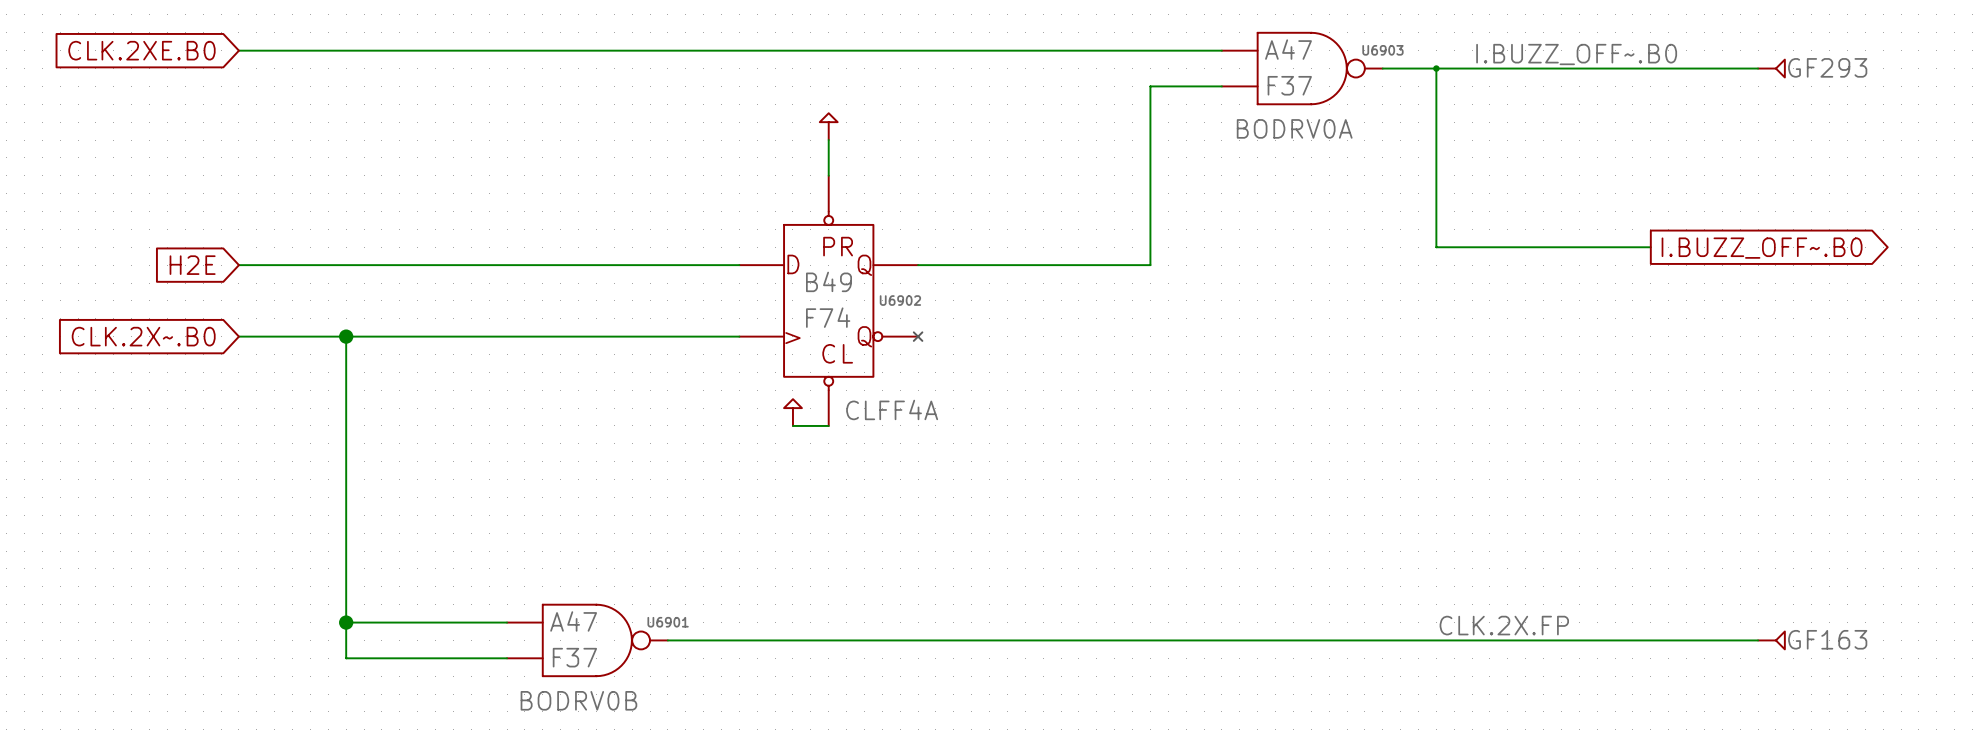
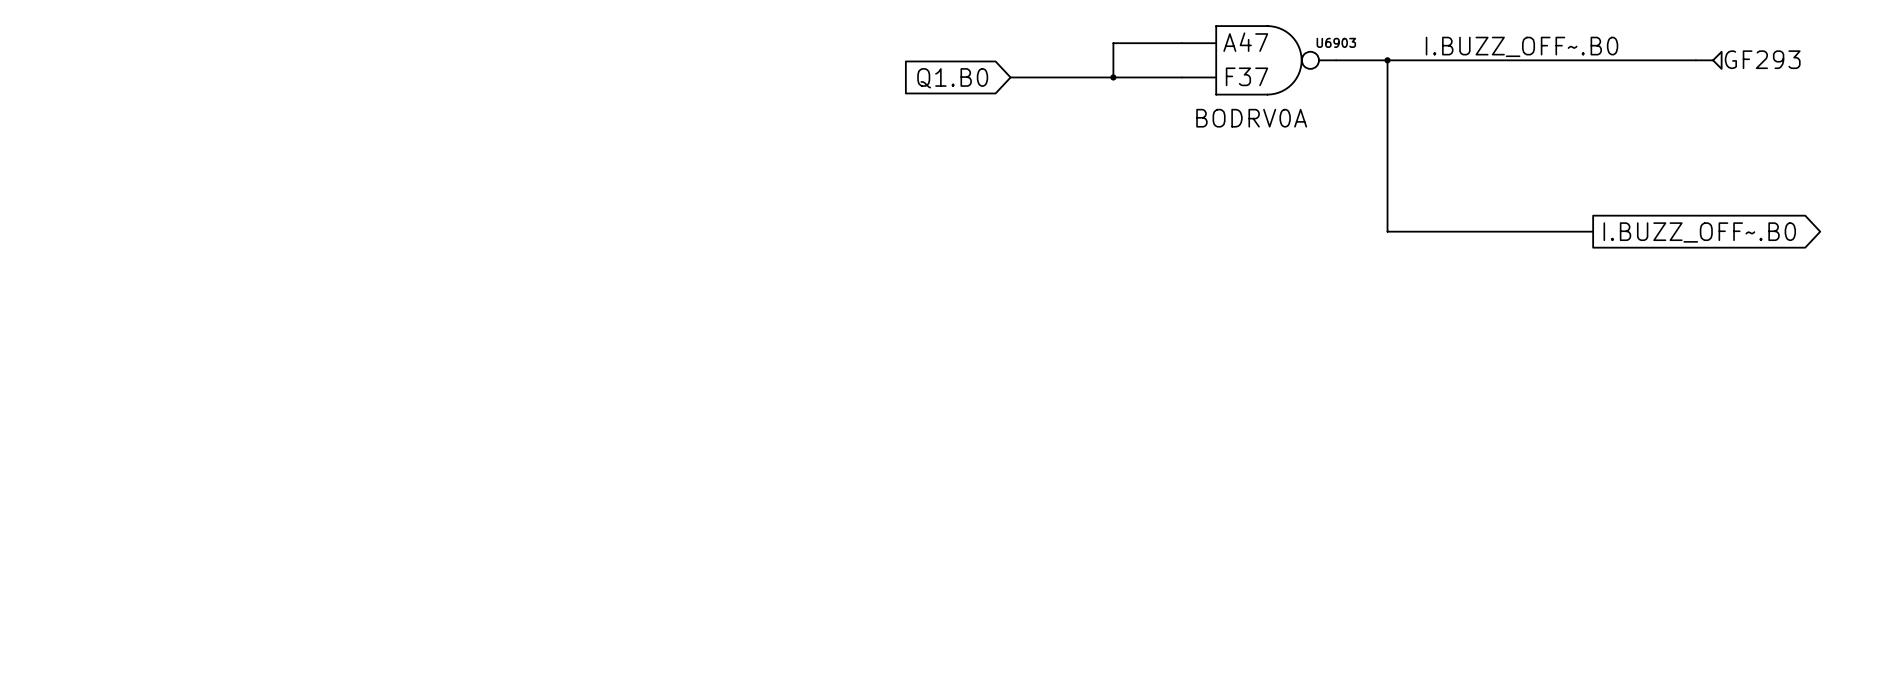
global label: CLK.2XE.B0 (141, 50) -> none
wire: (238, 50) (1150, 50) -> (1010, 77) (1113, 77) (1113, 43)
wire: (1150, 86) (1150, 265) (918, 265) -> none
junction: none -> (1113, 77)
global label: none -> Q1.B0 (952, 78)
power symbol: (828, 126) -> none
wire: (828, 140) (828, 175) -> none
global label: H2E (192, 265) -> none
wire: (238, 265) (739, 265) -> none
U6902: F74 (828, 300) -> none
global label: CLK.2X~.B0 (143, 336) -> none
wire: (238, 336) (739, 336) -> none
wire: (346, 336) (346, 658) (507, 658) -> none
junction: (346, 336) -> none
no-connect mark: (918, 336) -> none
power symbol: (792, 412) -> none
wire: (792, 425) (828, 425) -> none
wire: (346, 622) (507, 622) -> none
junction: (346, 622) -> none
label: CLK.2X.FP (1504, 625) -> none
U6901: F37 (587, 640) -> none
wire: (667, 640) (1758, 640) -> none
GF163: (1771, 640) -> none

